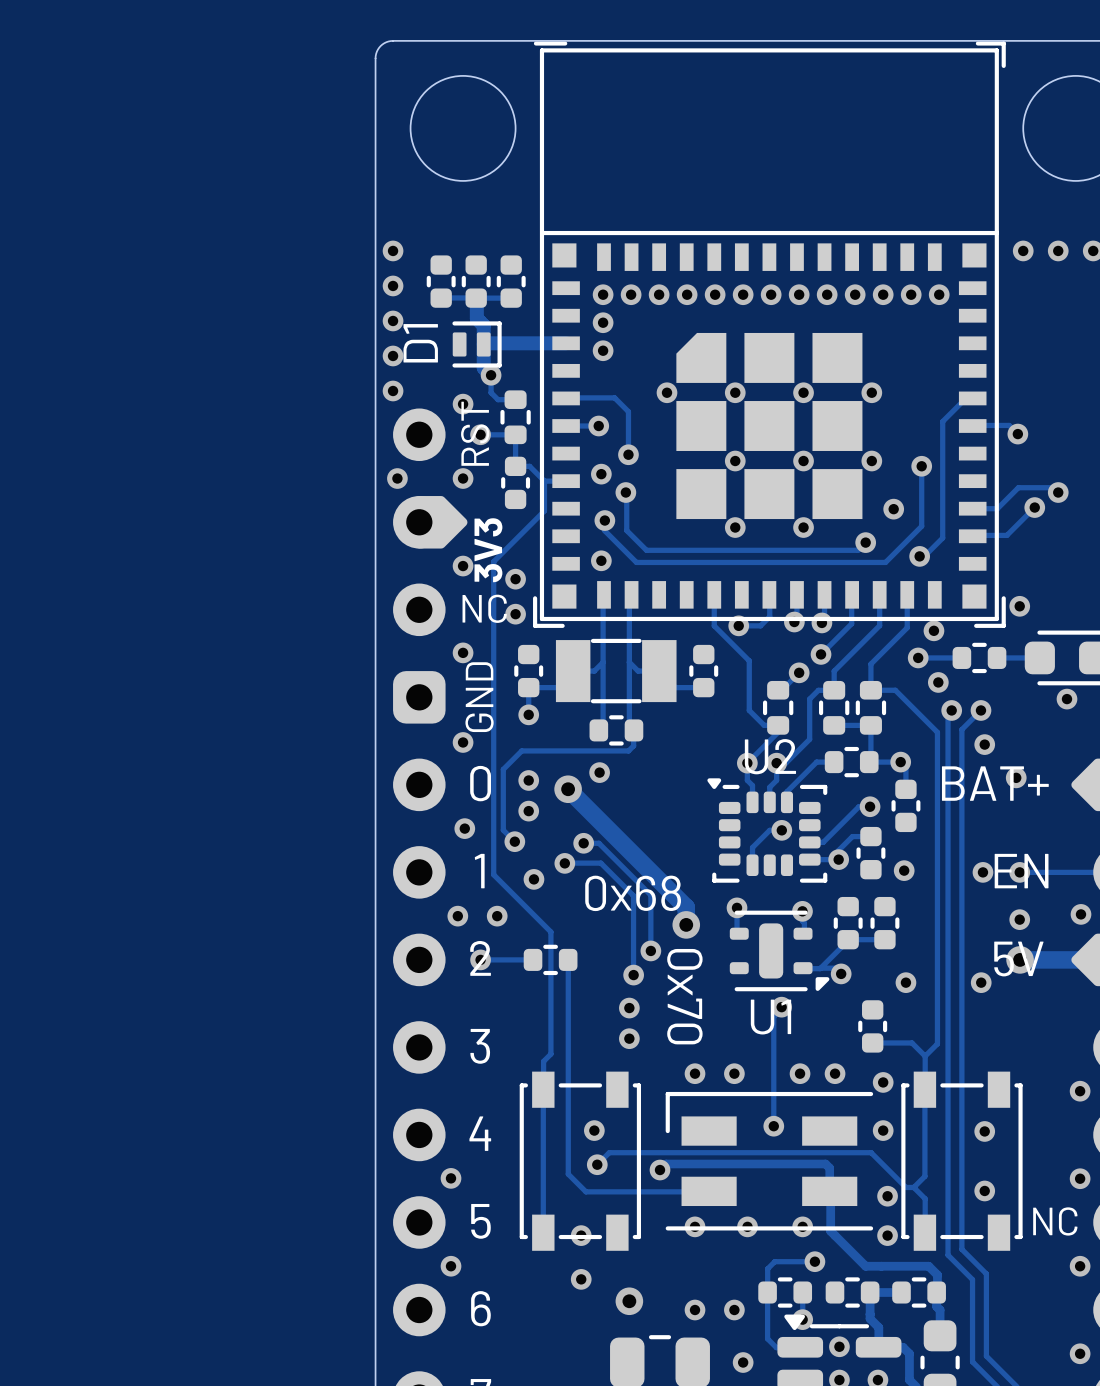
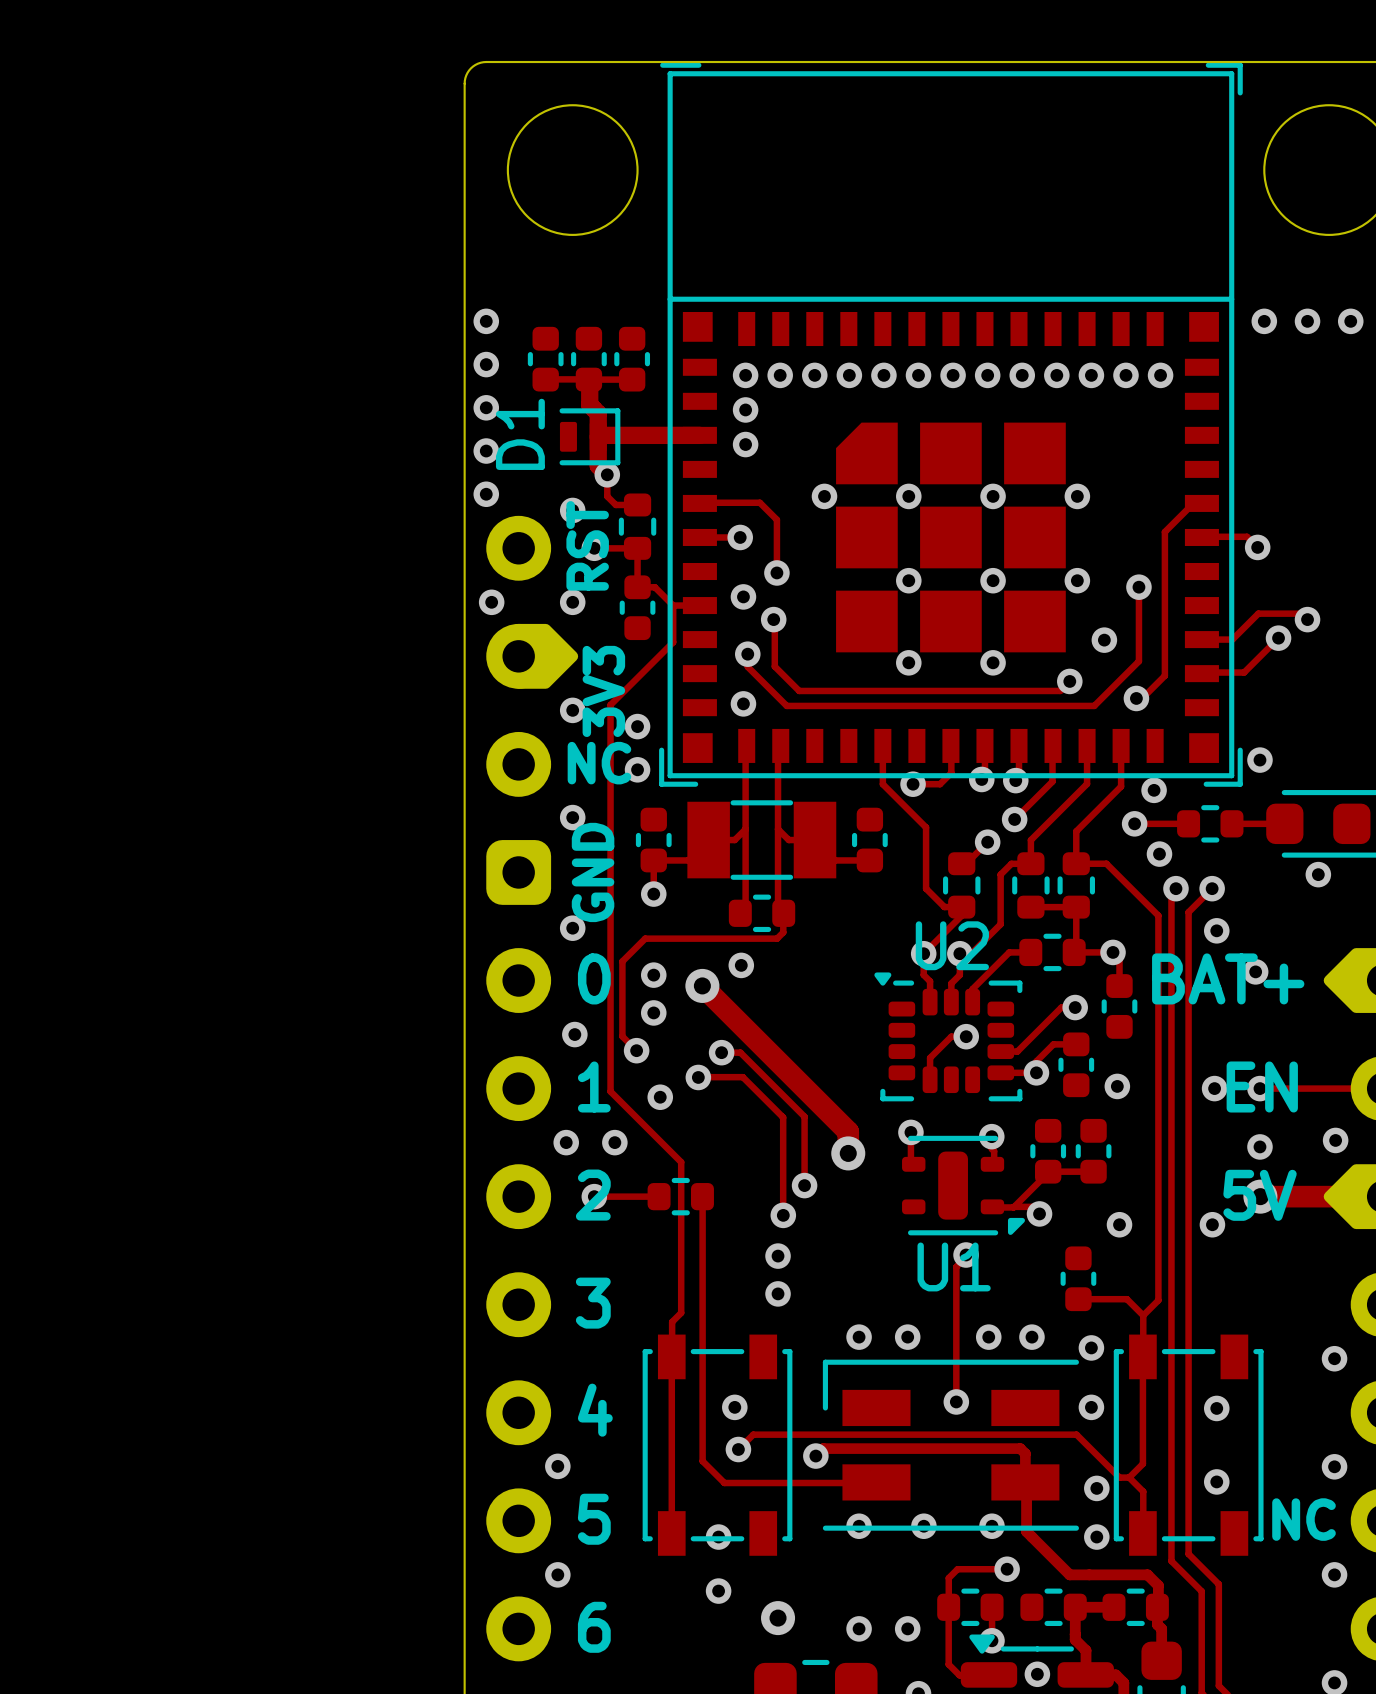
text: 0x68 (633, 893) -> none
text: 0x70 (684, 996) -> none

